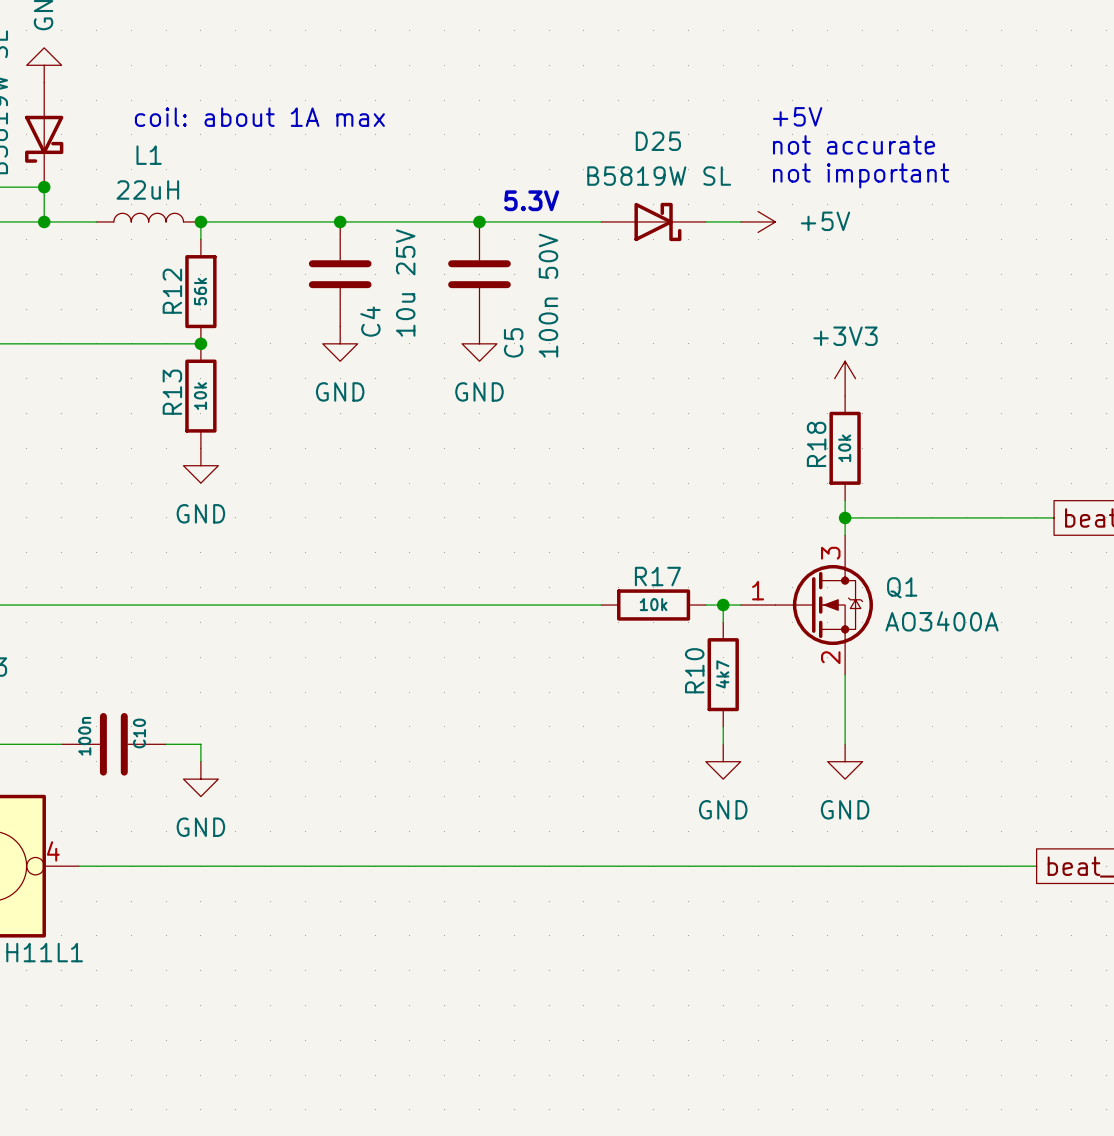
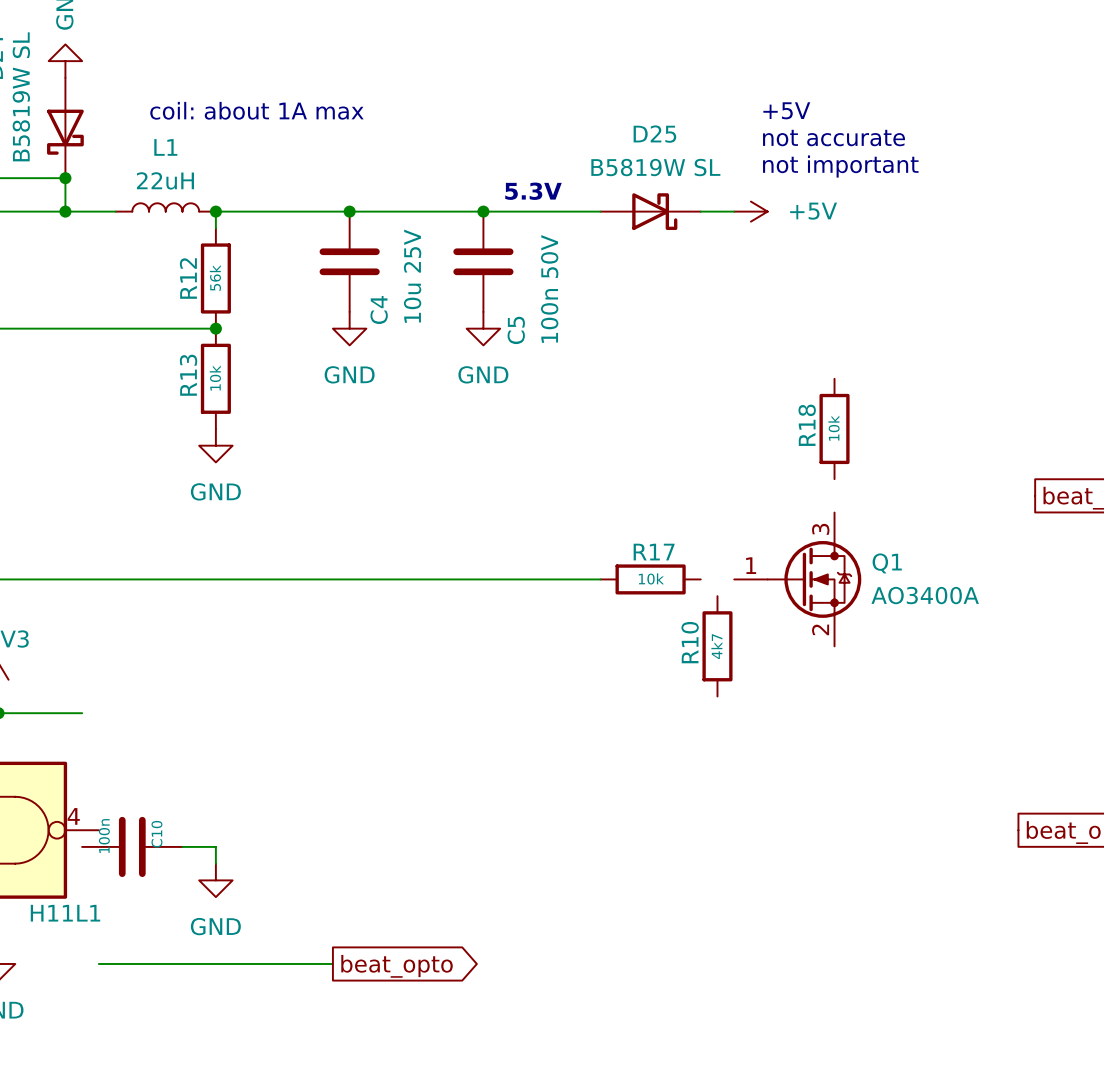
power symbol: +3V3 (845, 378) -> none
wire: (845, 500) (845, 535) -> none
wire: (845, 517) (1054, 517) -> none
junction: (845, 517) -> none
wire: (705, 605) (740, 605) -> none
wire: (723, 605) (723, 622) -> none
junction: (723, 605) -> none
wire: (845, 674) (845, 744) -> none
wire: (723, 726) (723, 744) -> none
C10 position: (113, 744) -> (132, 846)
wire: (166, 744) (200, 744) (200, 761) -> (182, 846) (215, 846) (215, 863)
power symbol: GND (723, 761) -> none
power symbol: GND (845, 761) -> none
power symbol position: GND (200, 779) -> GND (215, 880)
wire: (79, 866) (1036, 866) -> none
wire: none -> (98, 963) (332, 963)
global label: none -> beat_opto (397, 966)

